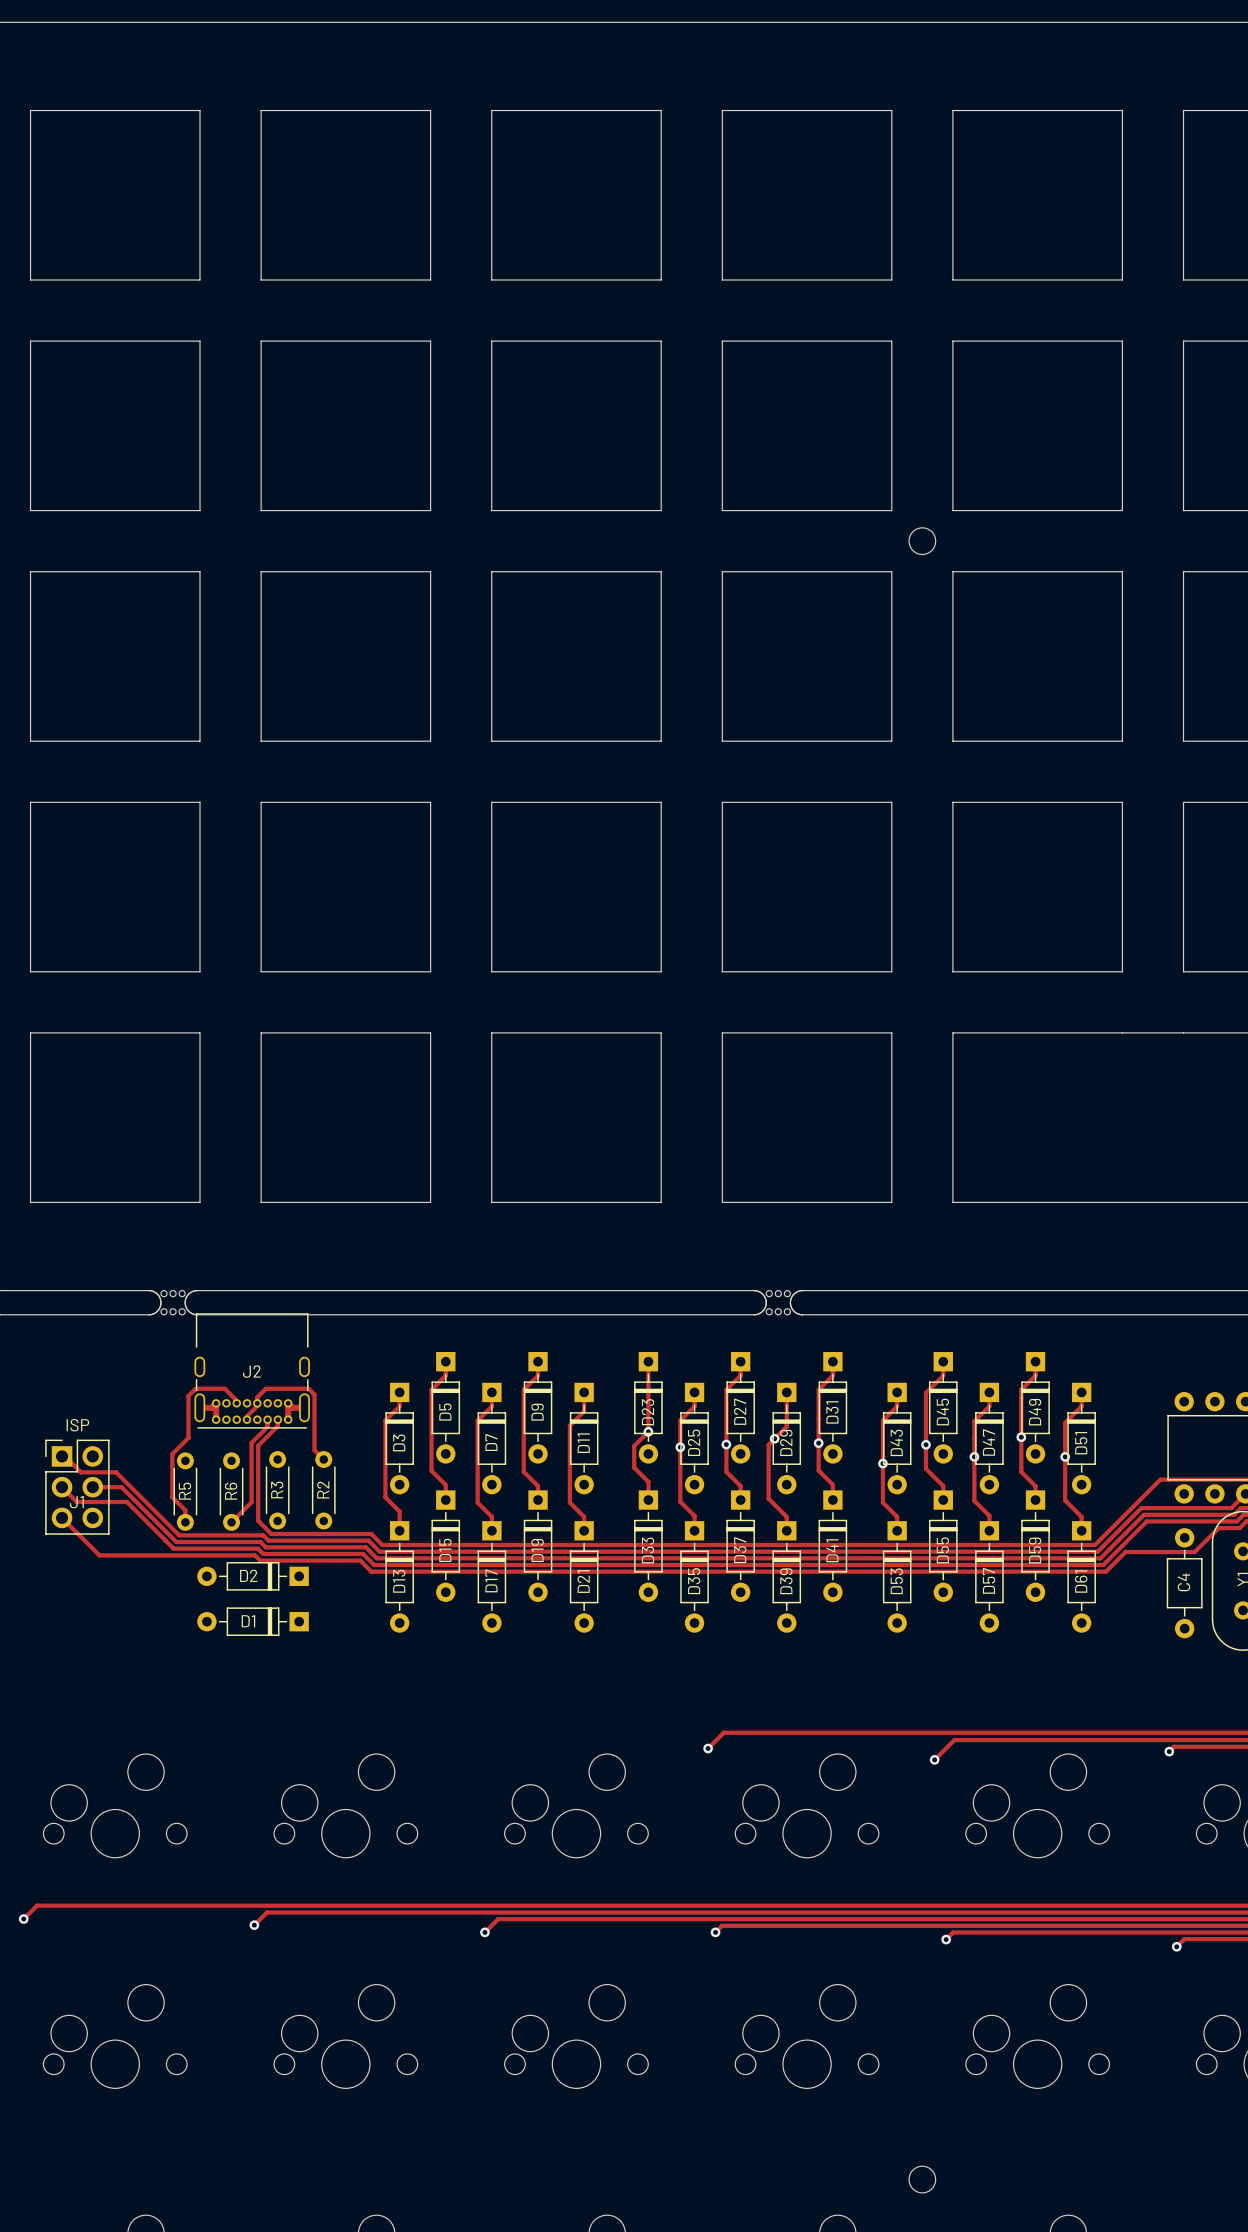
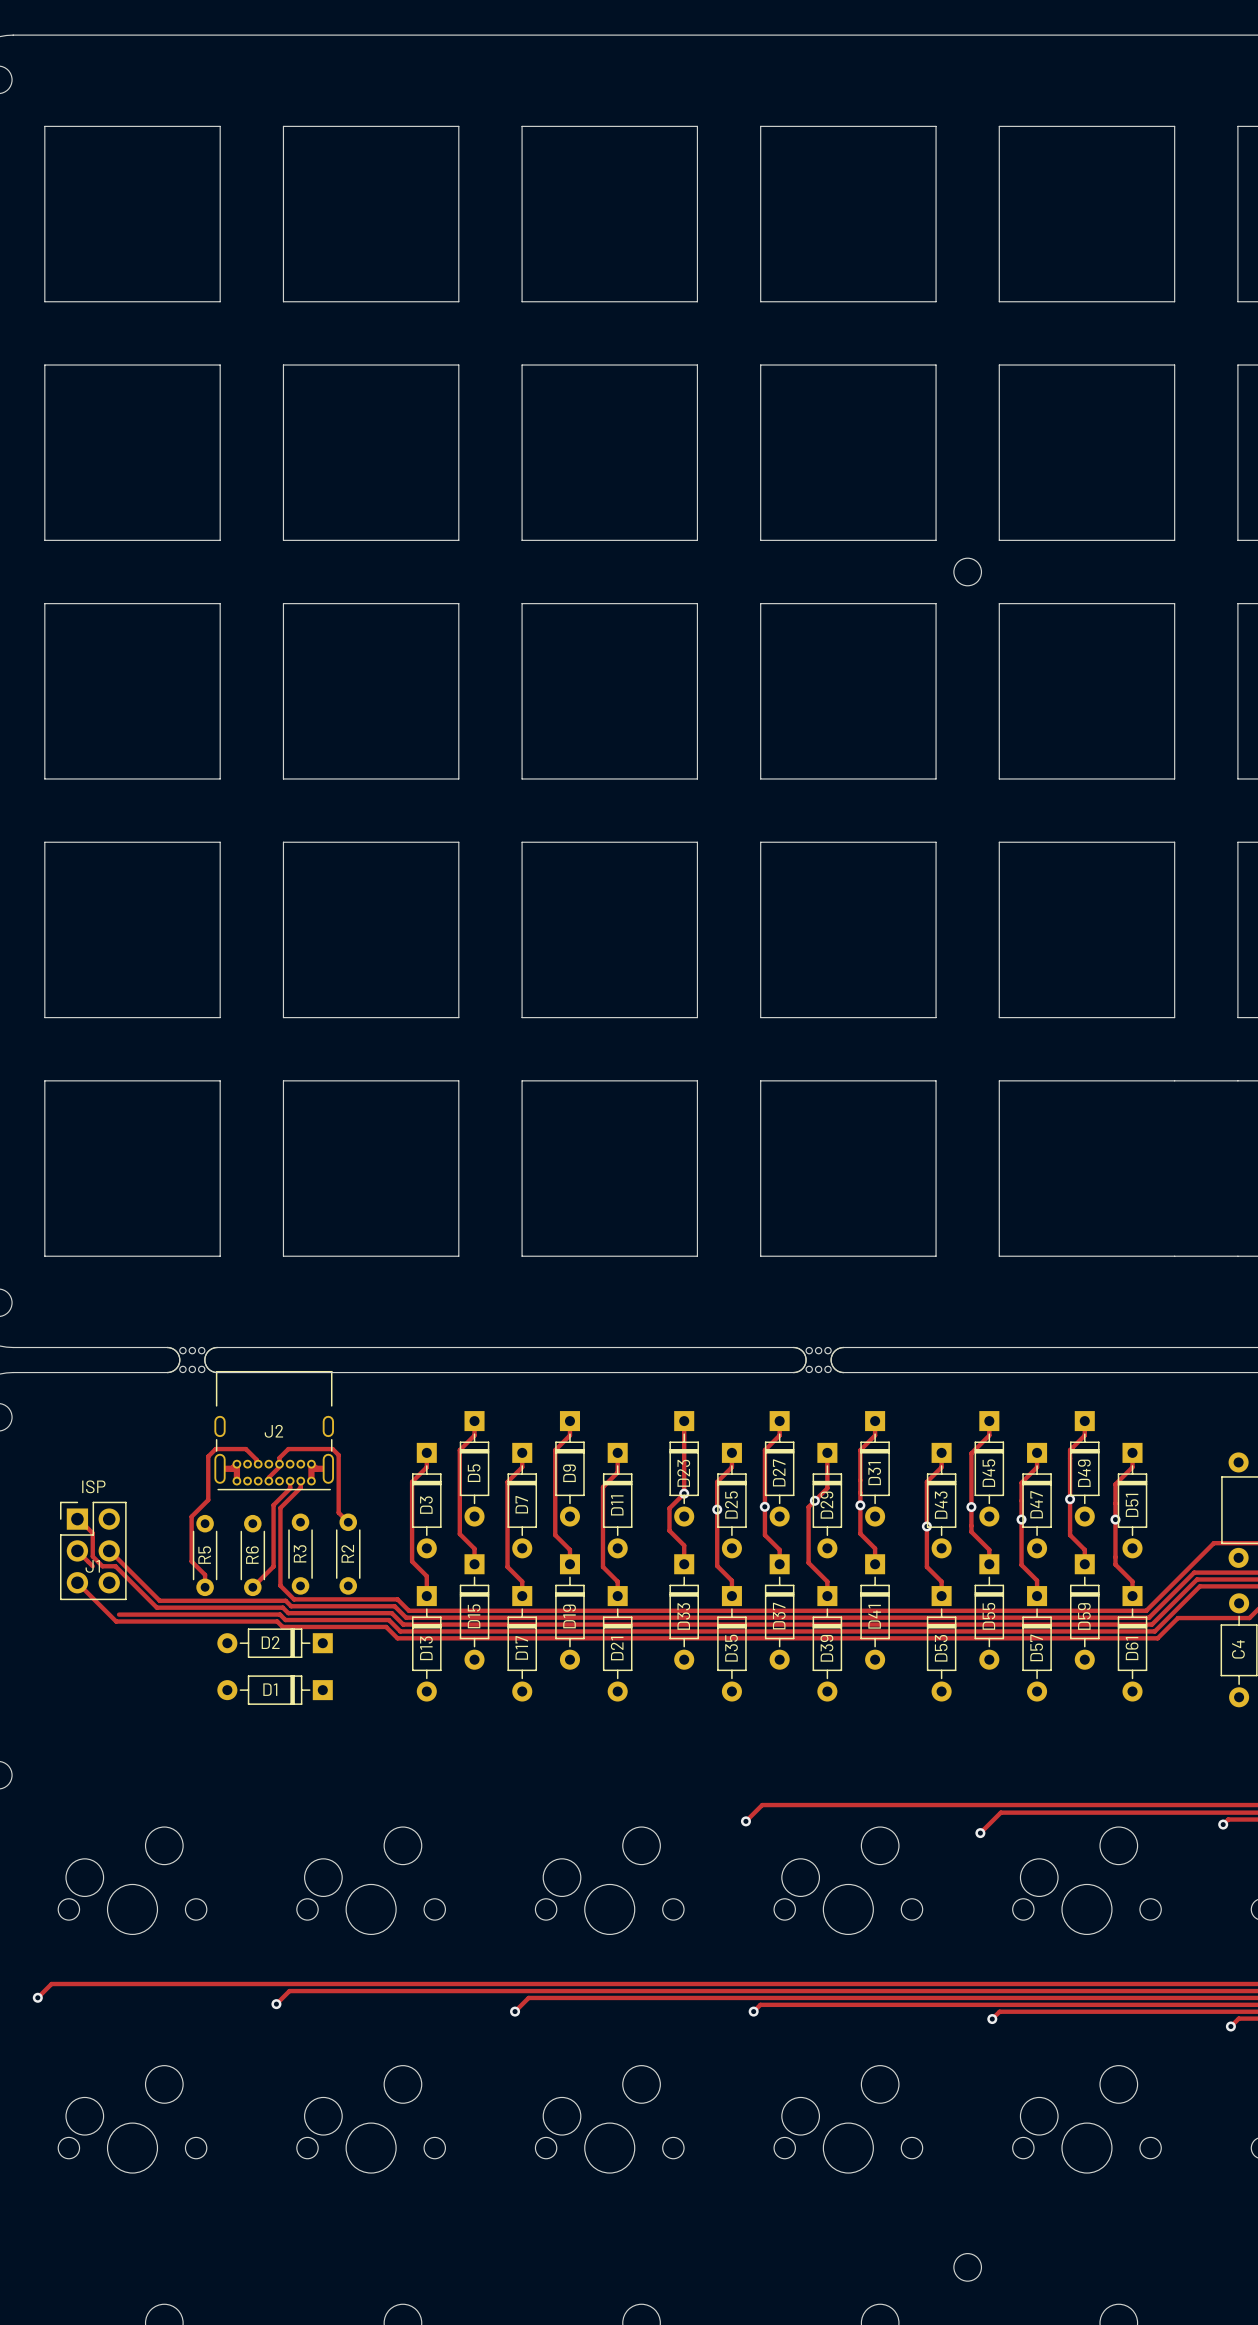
track: (65, 1456) (81, 1472) (116, 1472) (179, 1535) -> none
track: (93, 1487) (121, 1487) (176, 1542) -> (109, 1550) (159, 1600) (198, 1600)
track: (76, 1502) (86, 1502) -> (78, 1519) (92, 1533) (92, 1556) (102, 1566)
track: (98, 1502) (126, 1502) (173, 1548) (257, 1548) -> (119, 1614) (280, 1614)
track: none -> (115, 1566) (156, 1607) (195, 1607)

